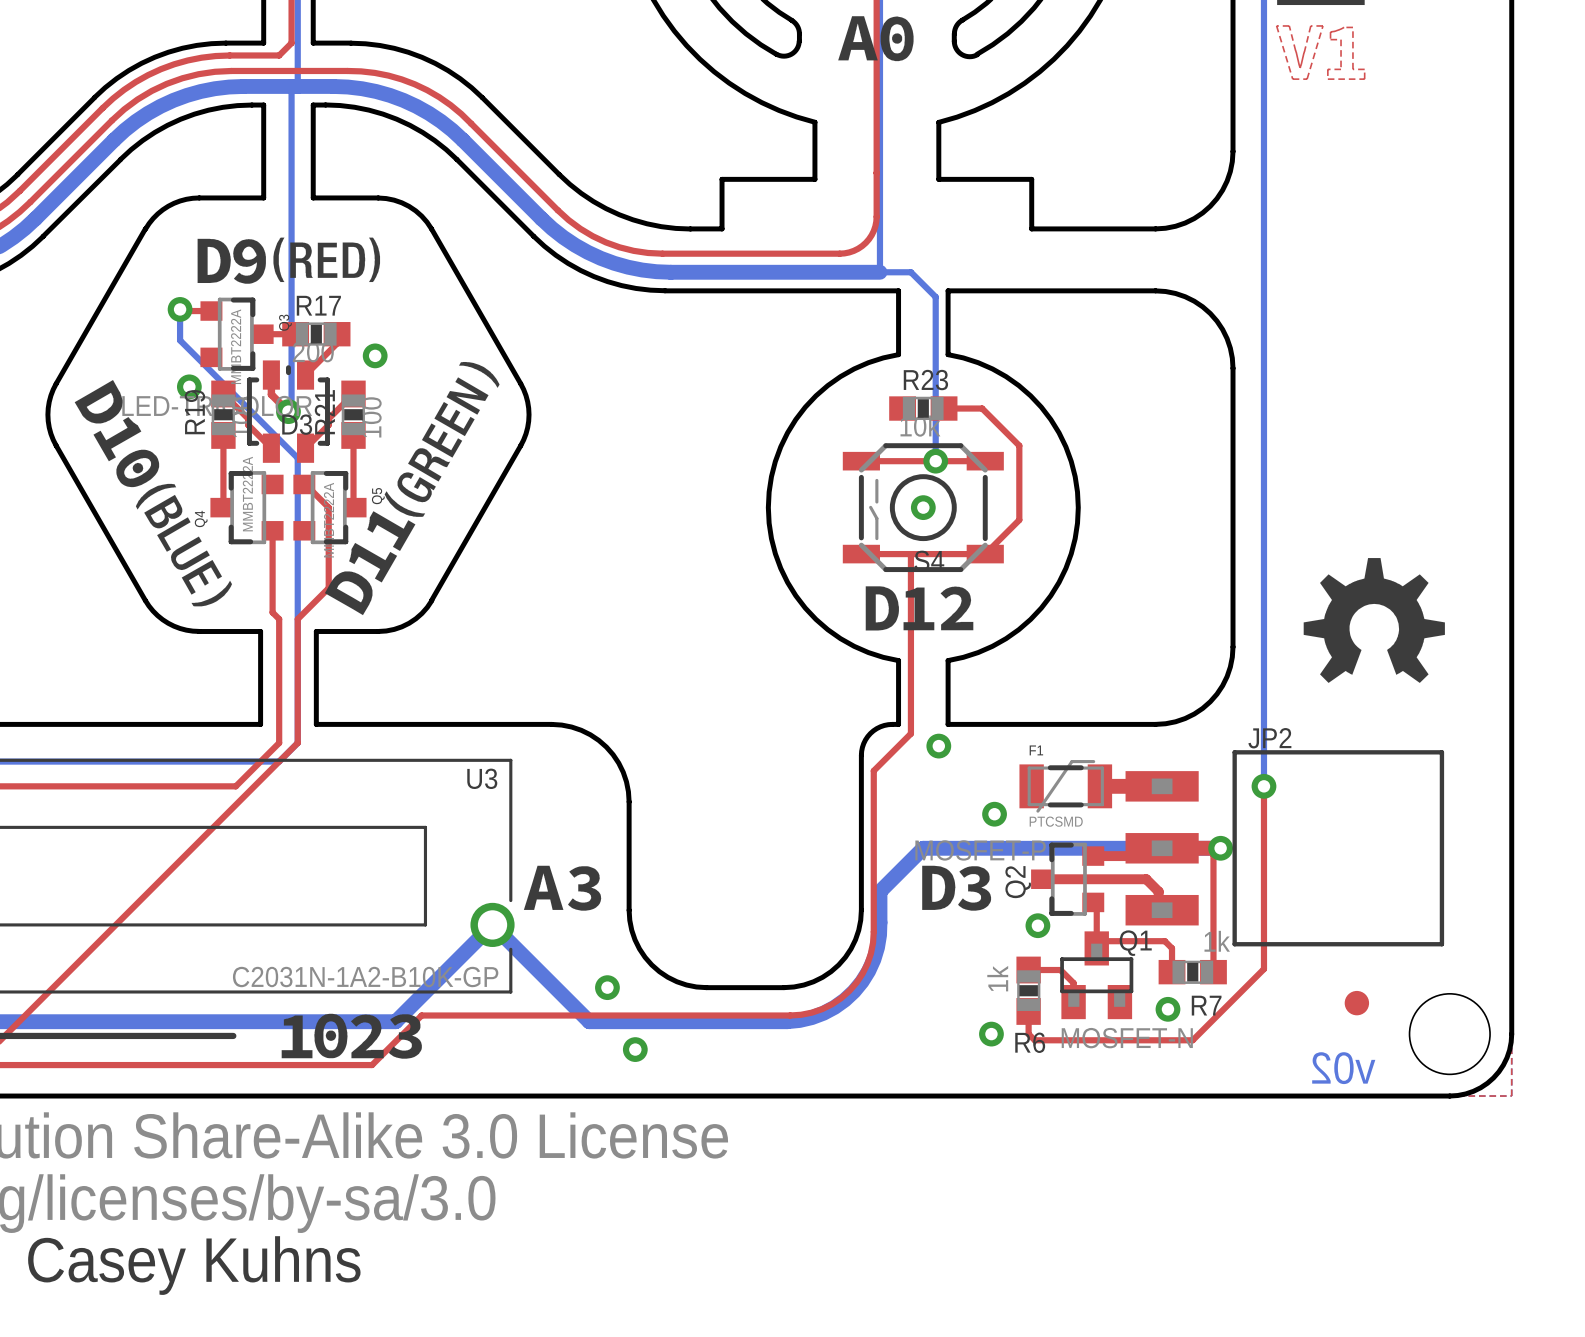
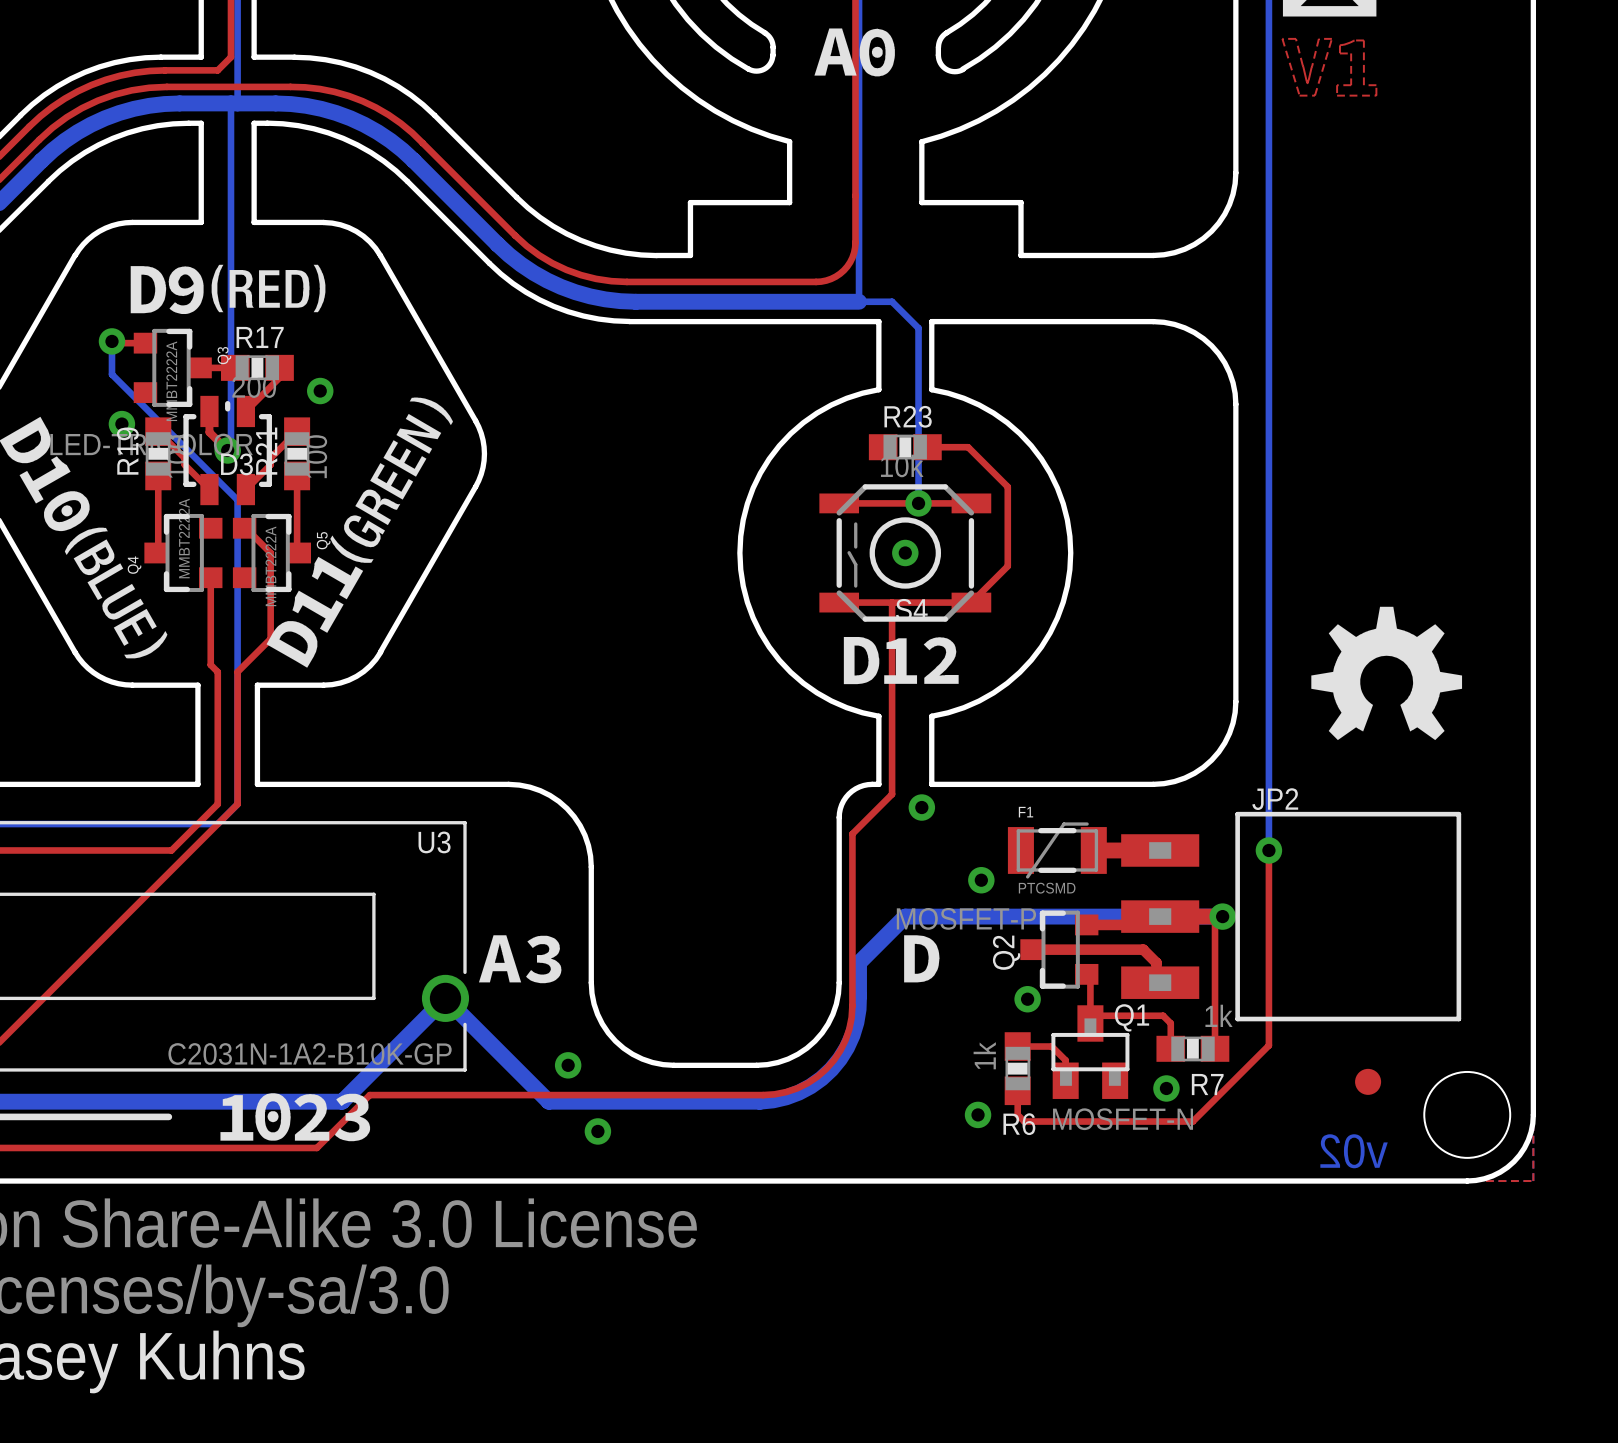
drawing: [958, 866, 992, 911] -> none

